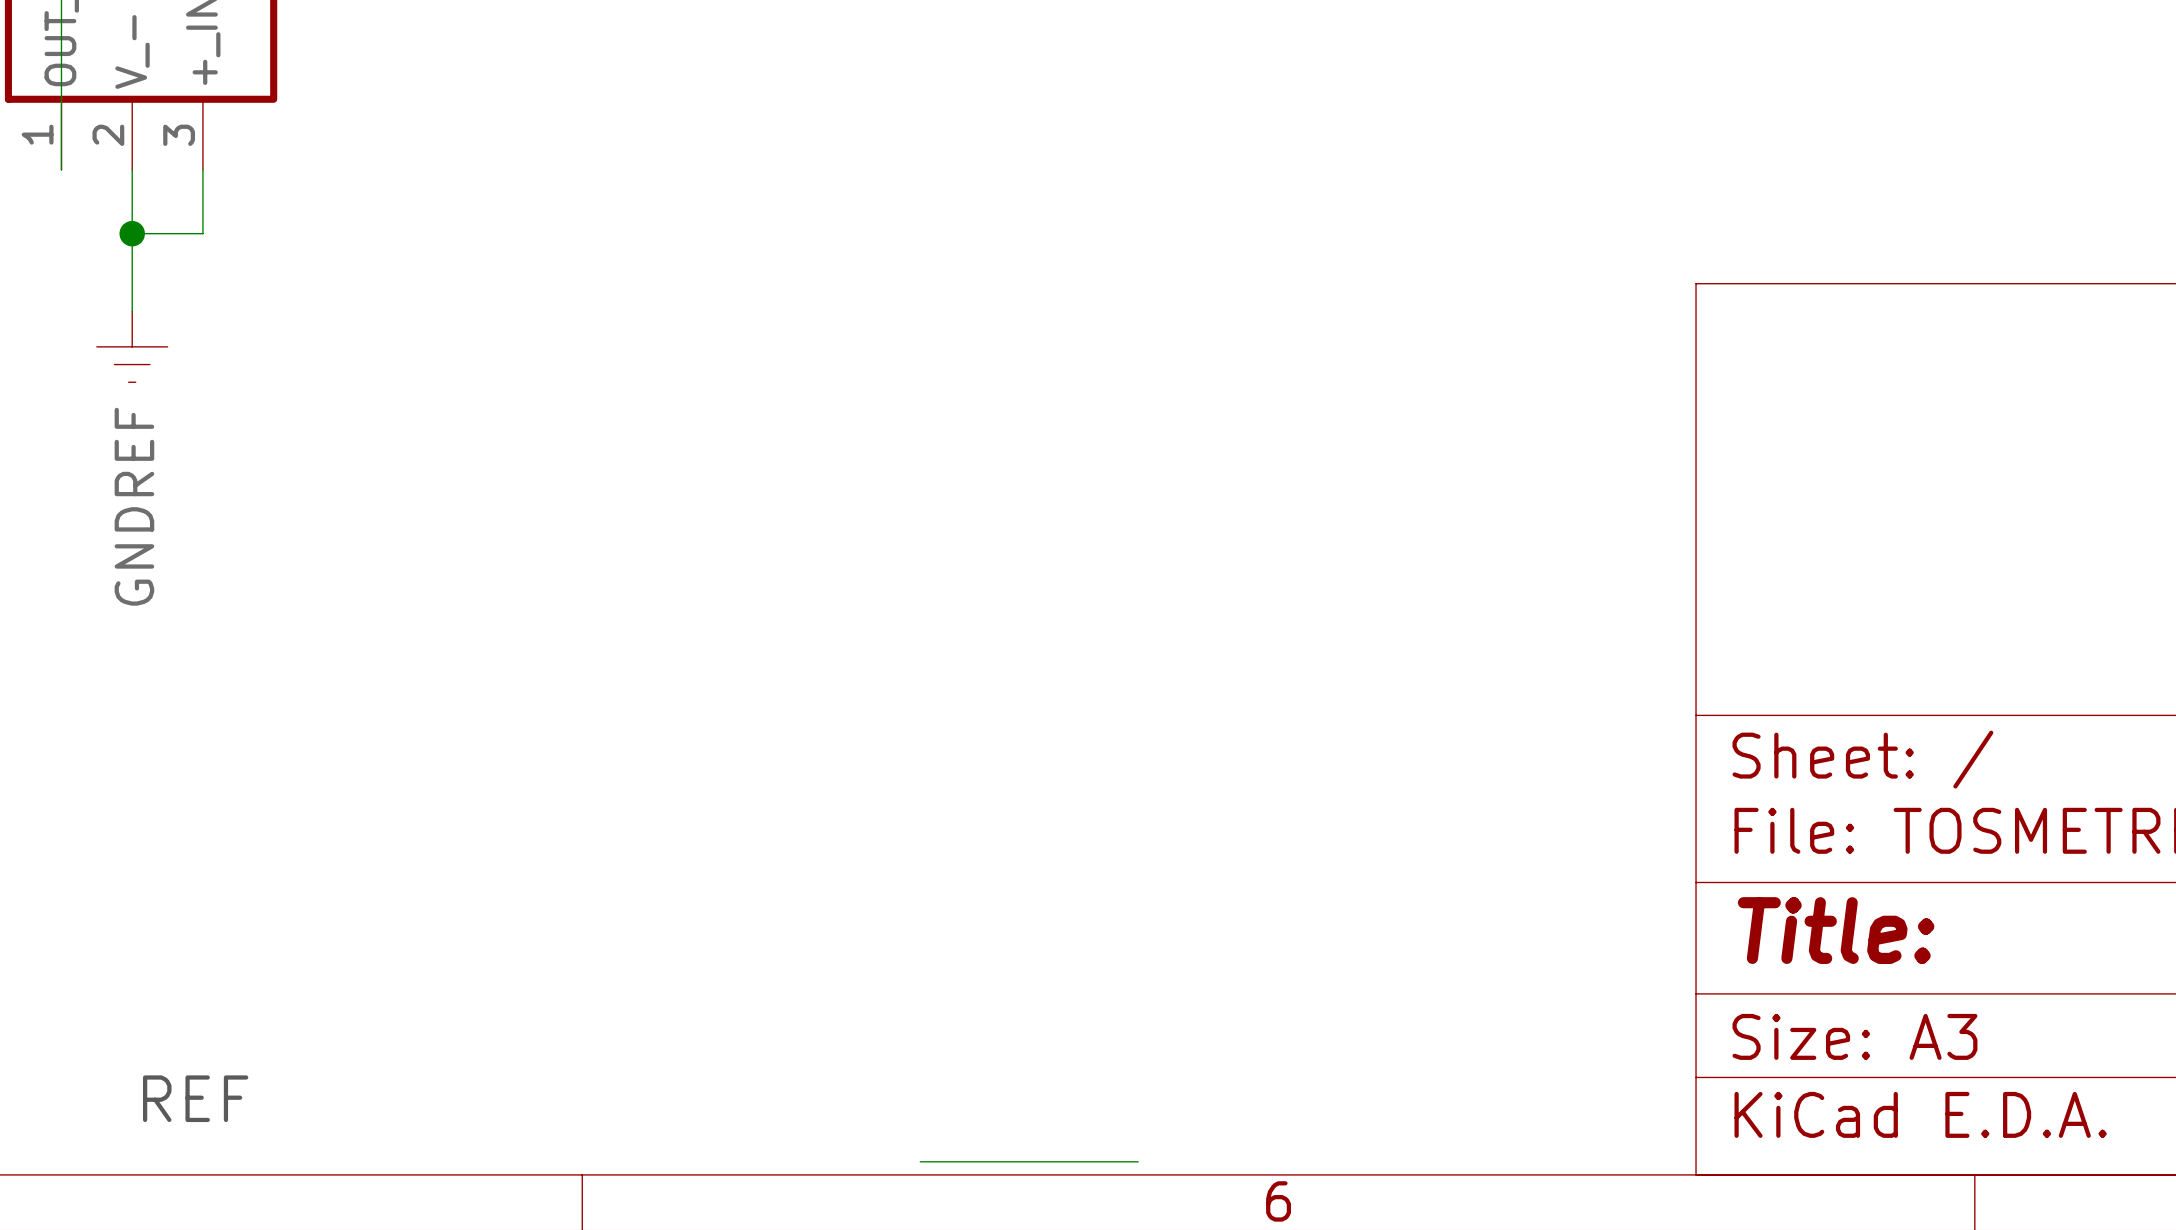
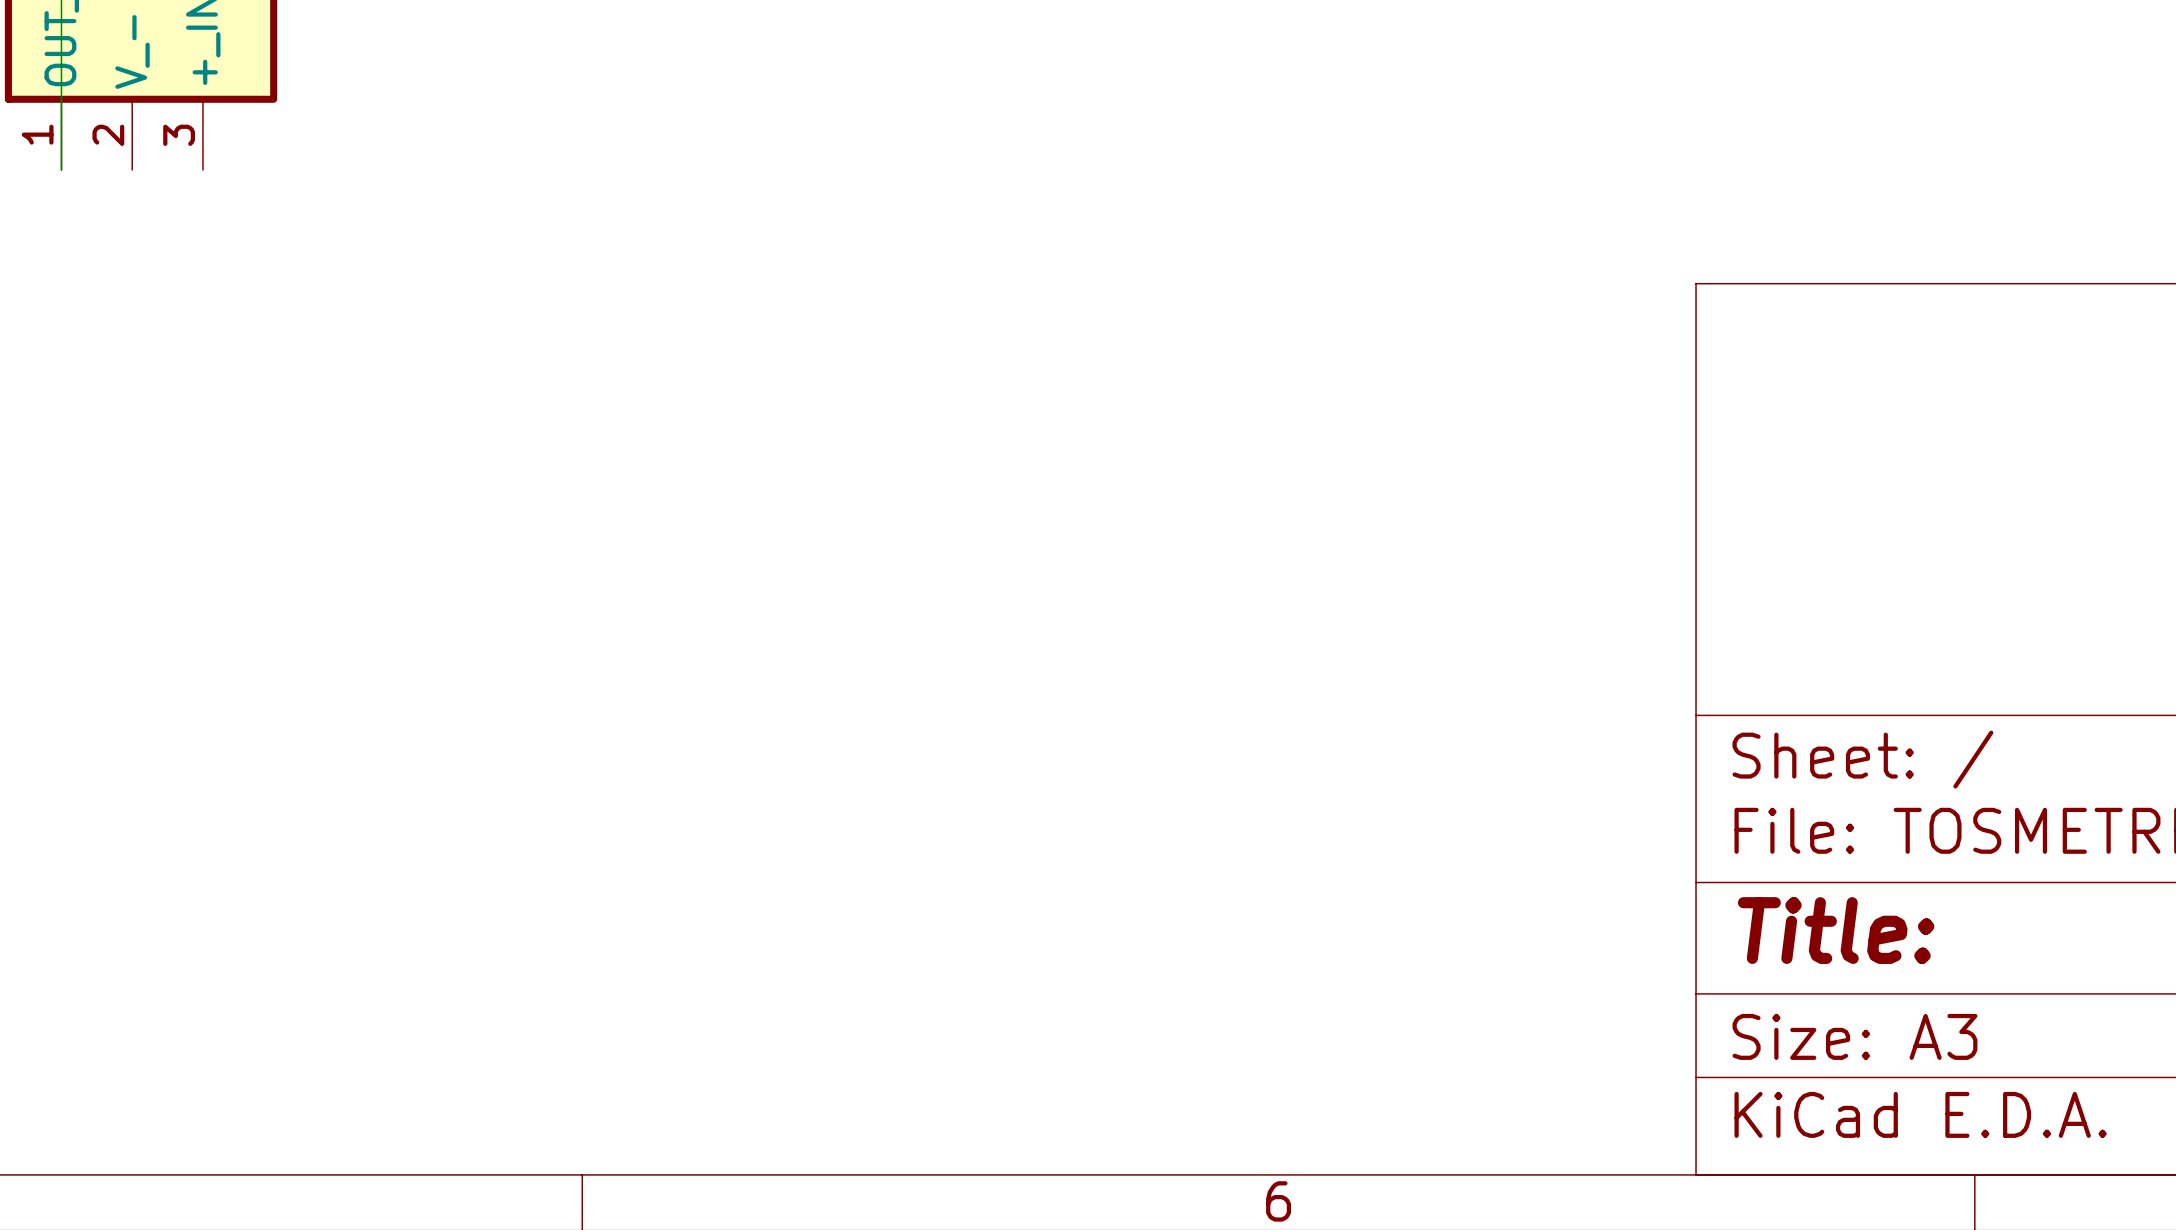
wire: (132, 170) (132, 311) -> none
wire: (202, 170) (202, 233) (132, 233) -> none
junction: (132, 233) -> none
power symbol: GNDREF (132, 346) -> none
text: REF (195, 1098) -> none
wire: (920, 1161) (1138, 1161) -> none

